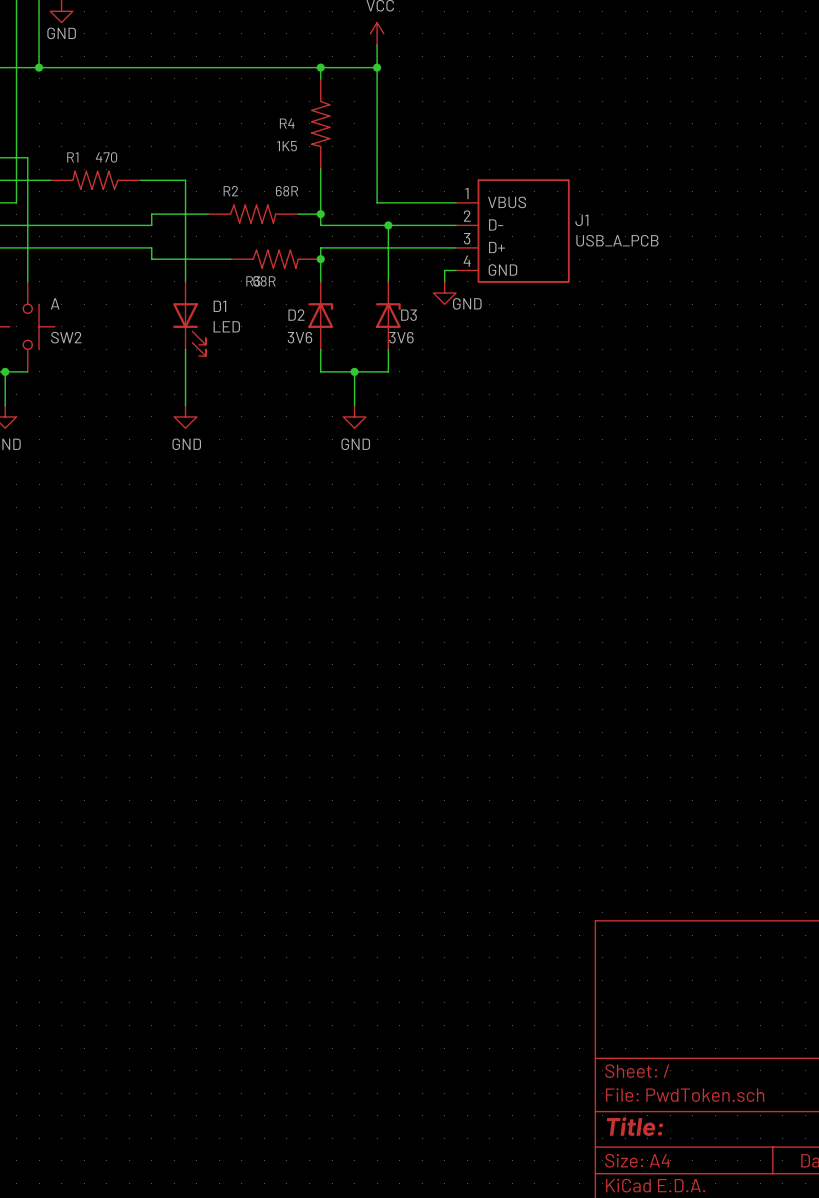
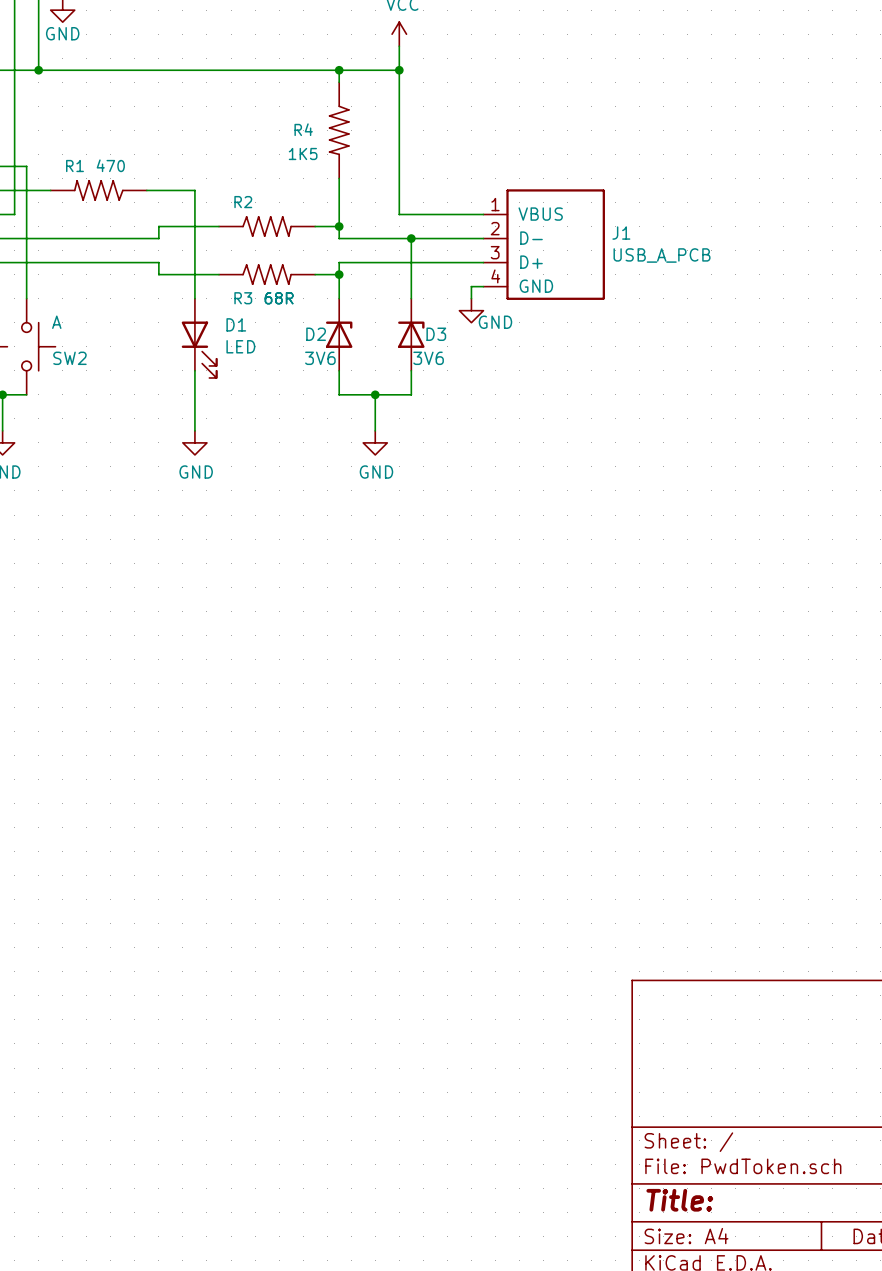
R3 value position: 68R (287, 191) -> 68R (279, 298)
R3 position: (275, 259) -> (267, 274)

